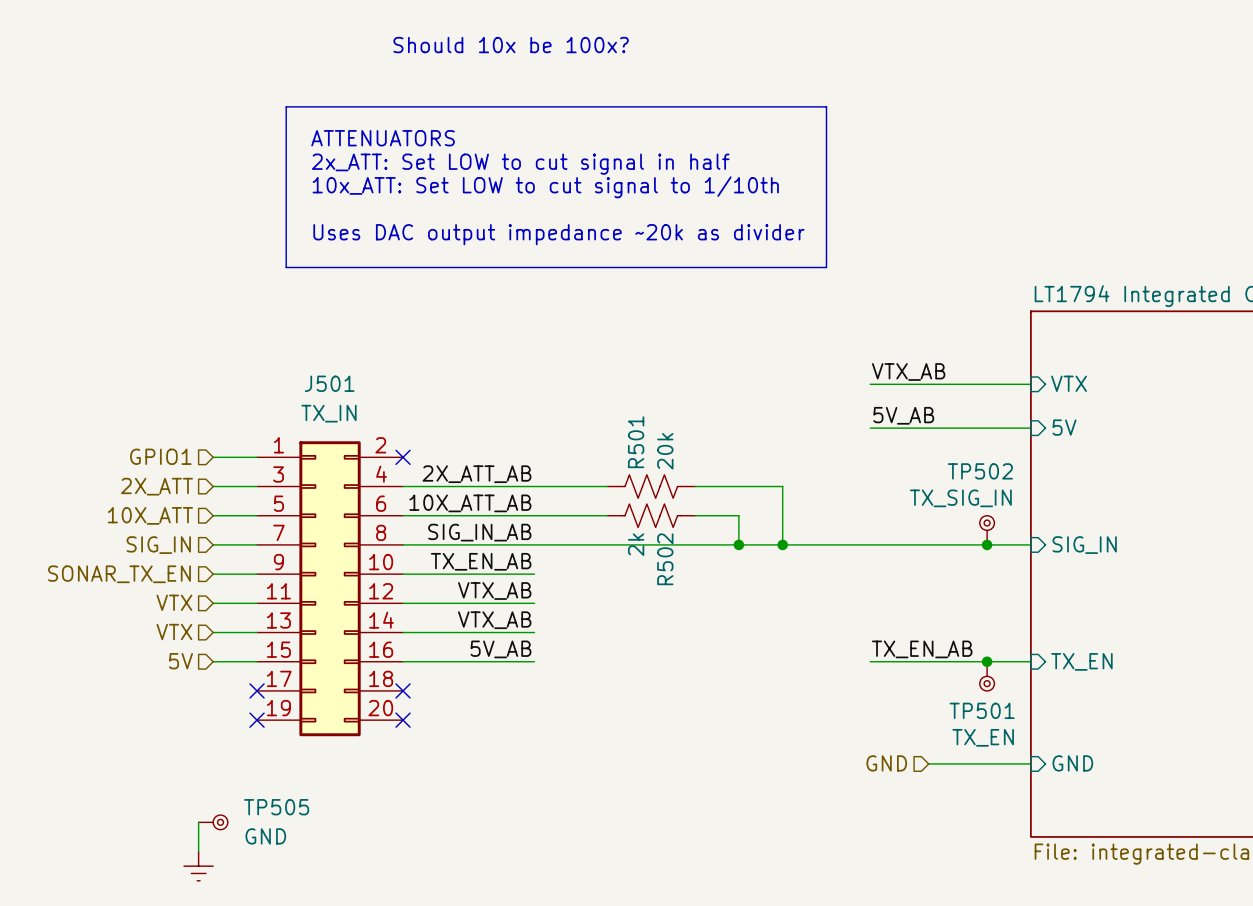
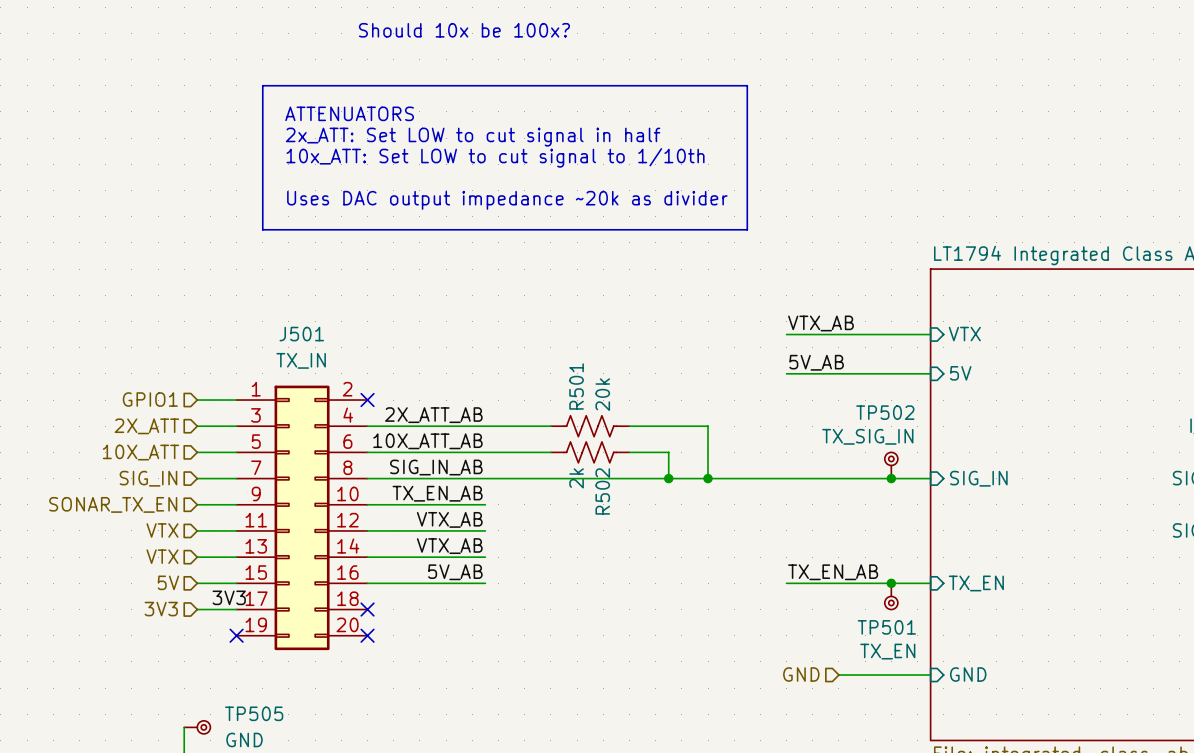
label: none -> 3V3 (229, 597)
hierarchical label: none -> 3V3 (161, 609)
wire: none -> (197, 609) (236, 609)
no-connect mark: (257, 690) -> none

